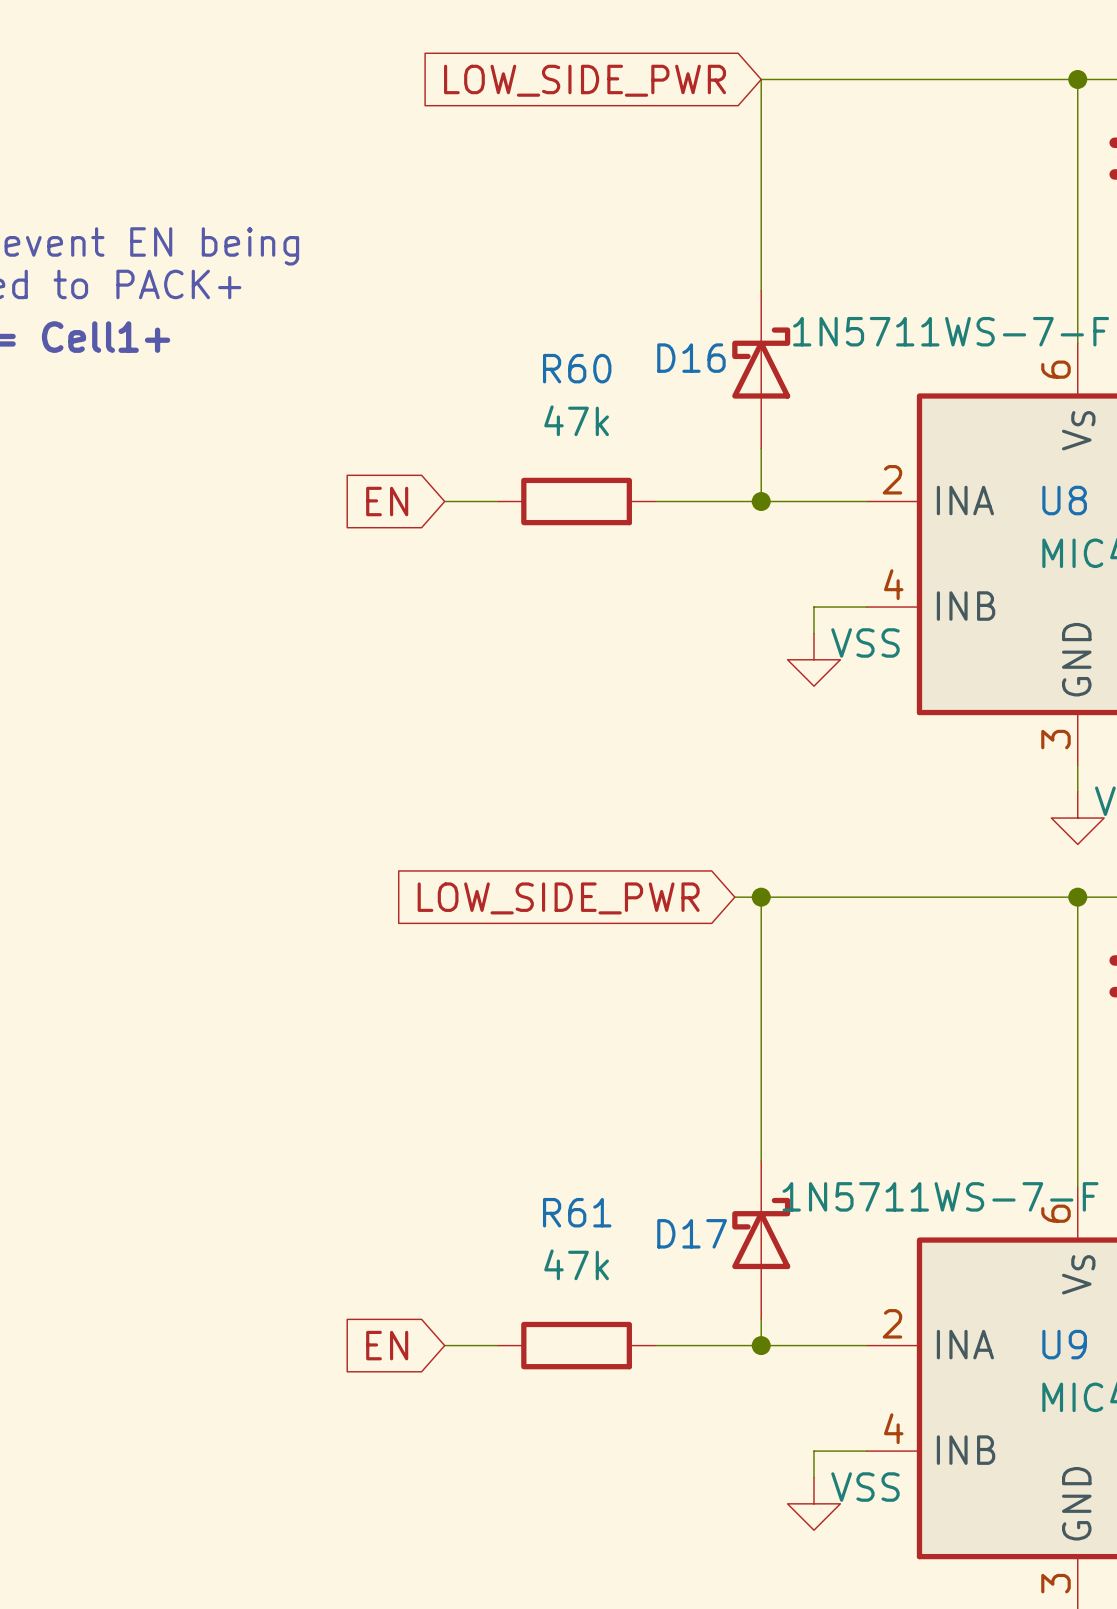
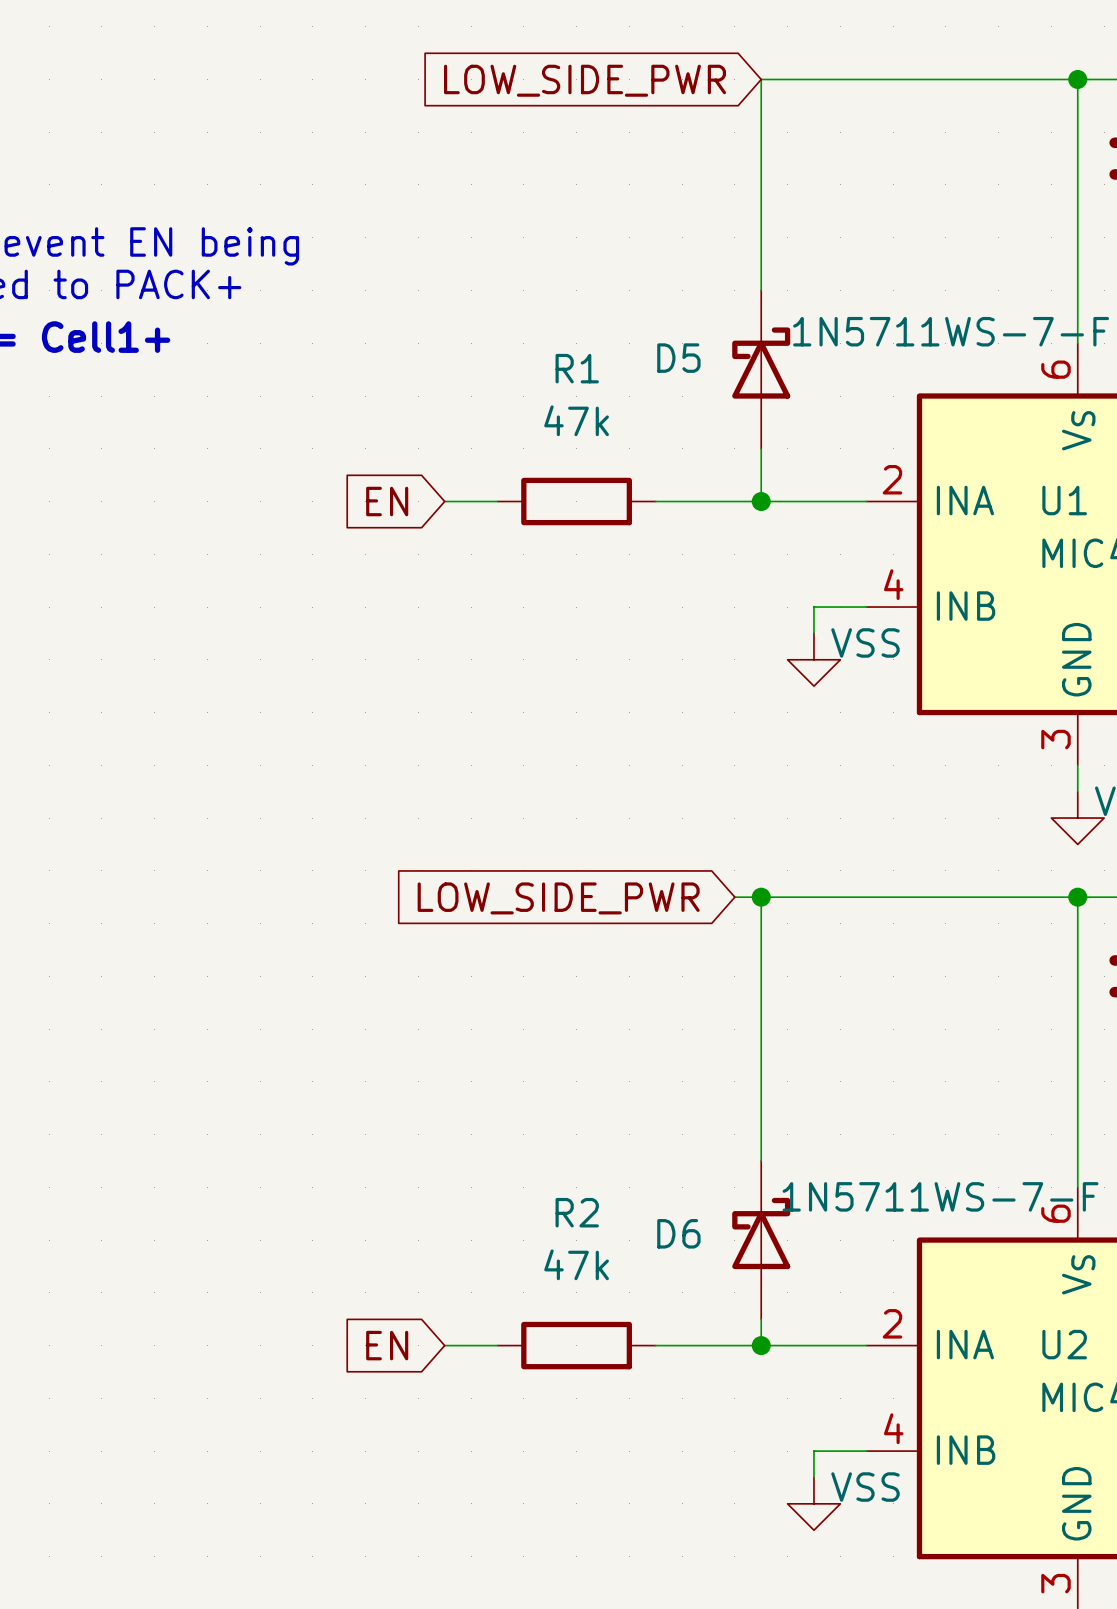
D16 name: D16 (691, 358) -> D5 (678, 358)
R60 name: R60 (577, 368) -> R1 (577, 368)
U8 name: U8 (1064, 500) -> U1 (1064, 500)
R61 name: R61 (577, 1212) -> R2 (577, 1212)
D17 name: D17 (692, 1233) -> D6 (678, 1233)
U9 name: U9 (1064, 1344) -> U2 (1064, 1344)

